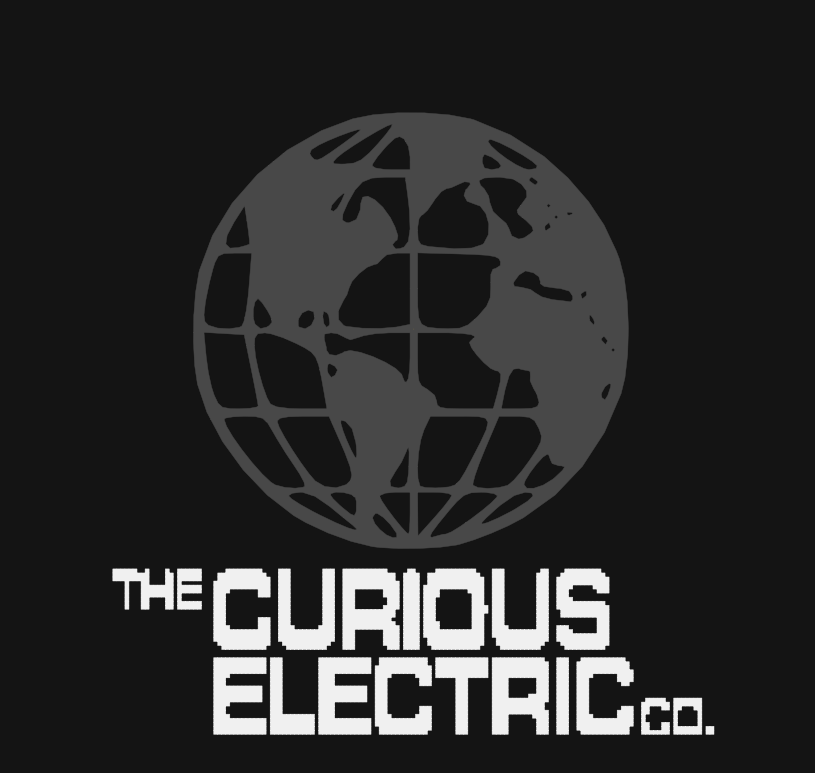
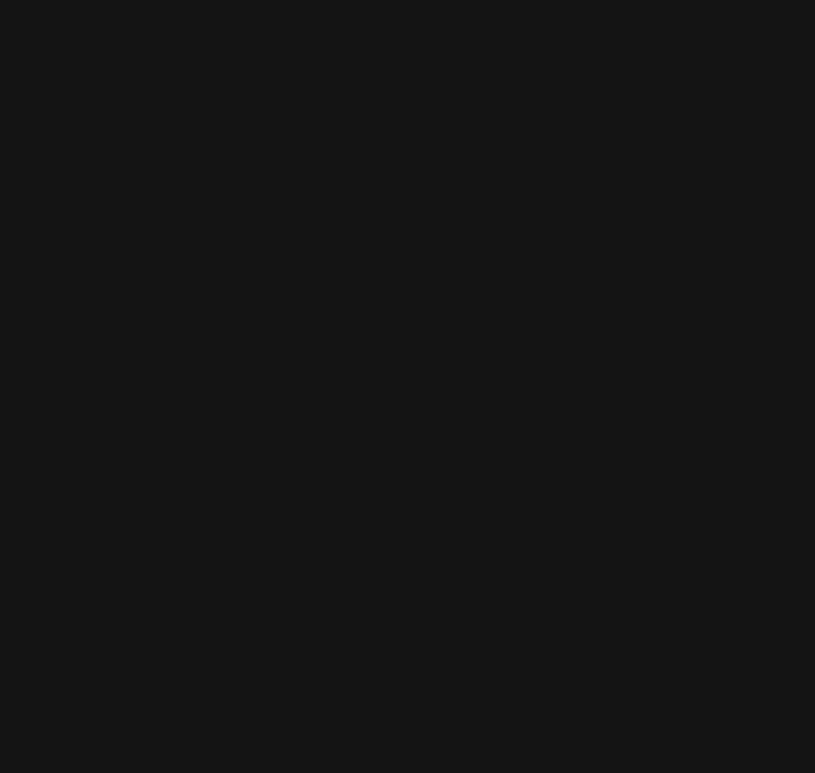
part: (410, 330) -> none
drawing: [112, 568, 715, 735] -> none

